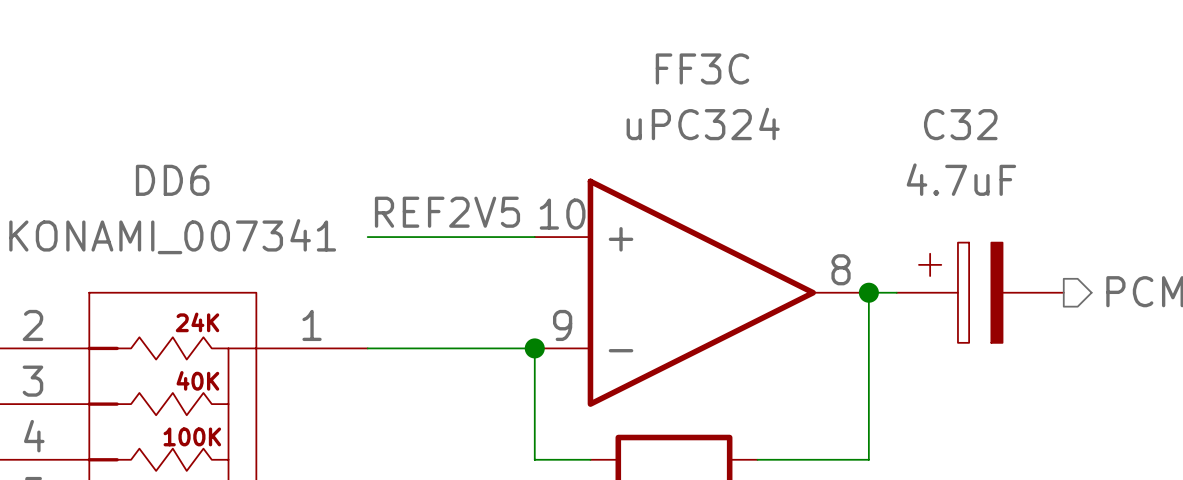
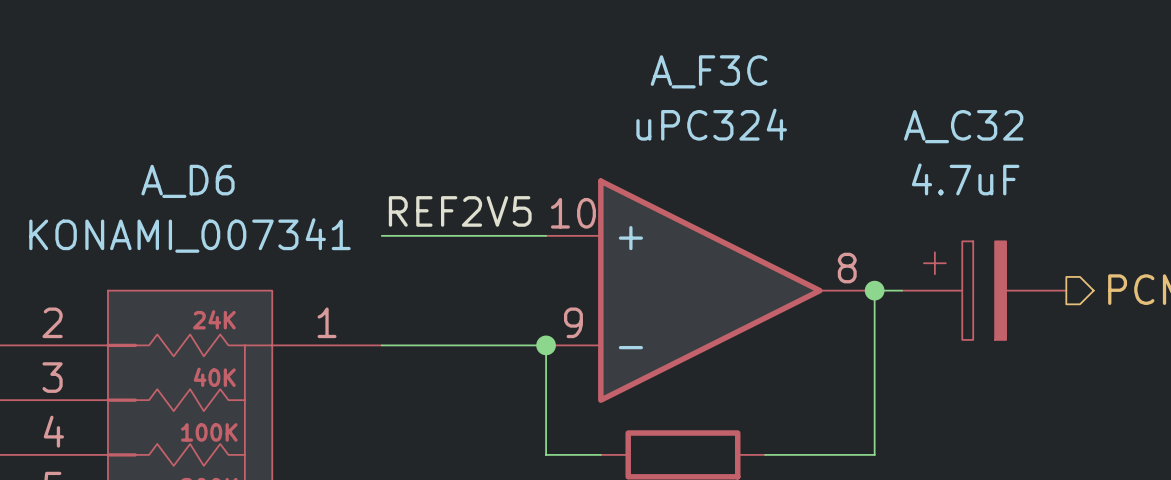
FF3C name: FF3C (702, 68) -> A_F3C (709, 71)
C32 name: C32 (960, 124) -> A_C32 (963, 126)
DD6 name: DD6 (172, 180) -> A_D6 (188, 181)

